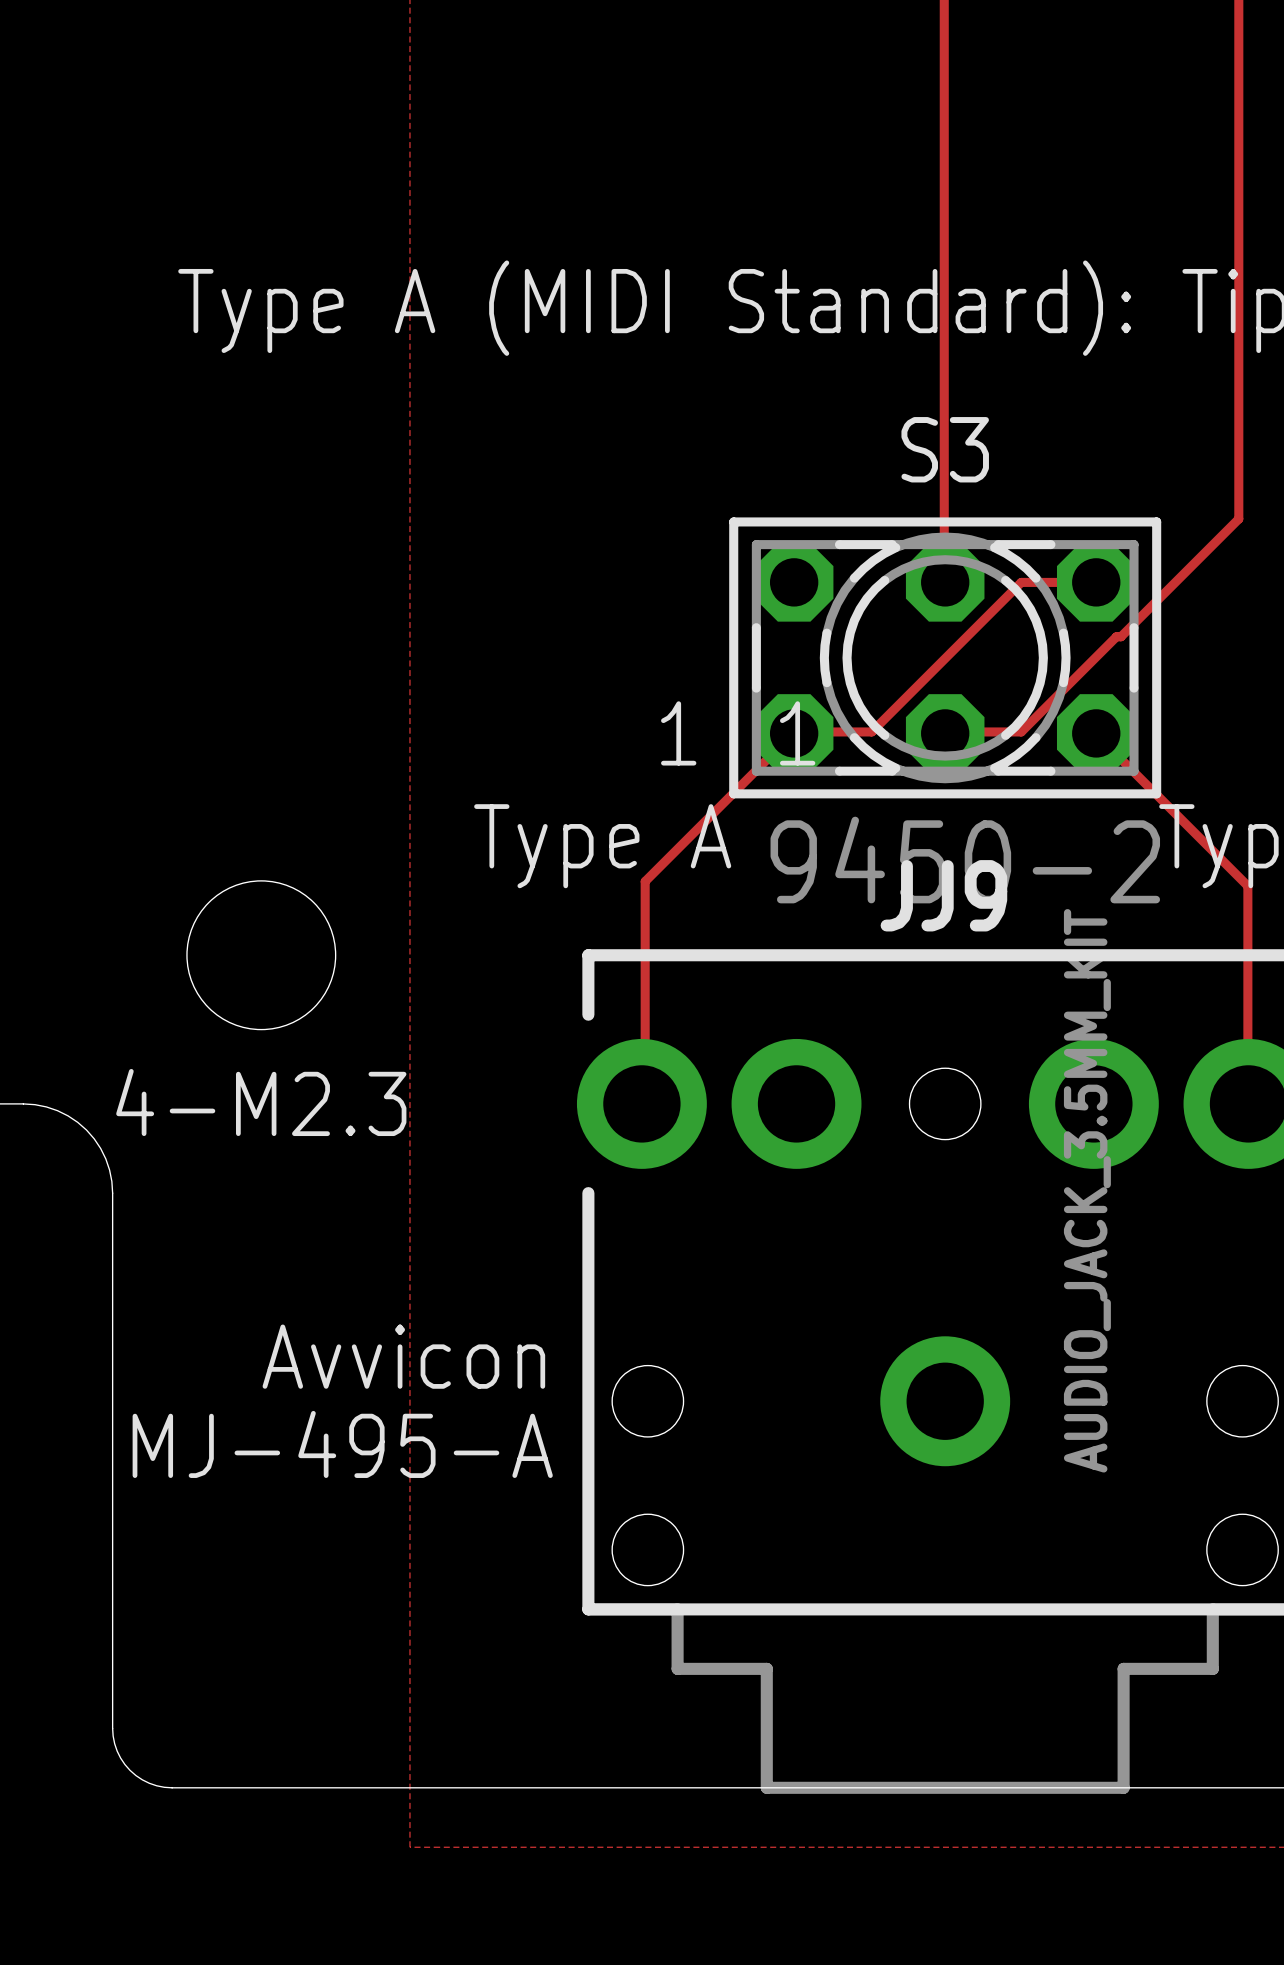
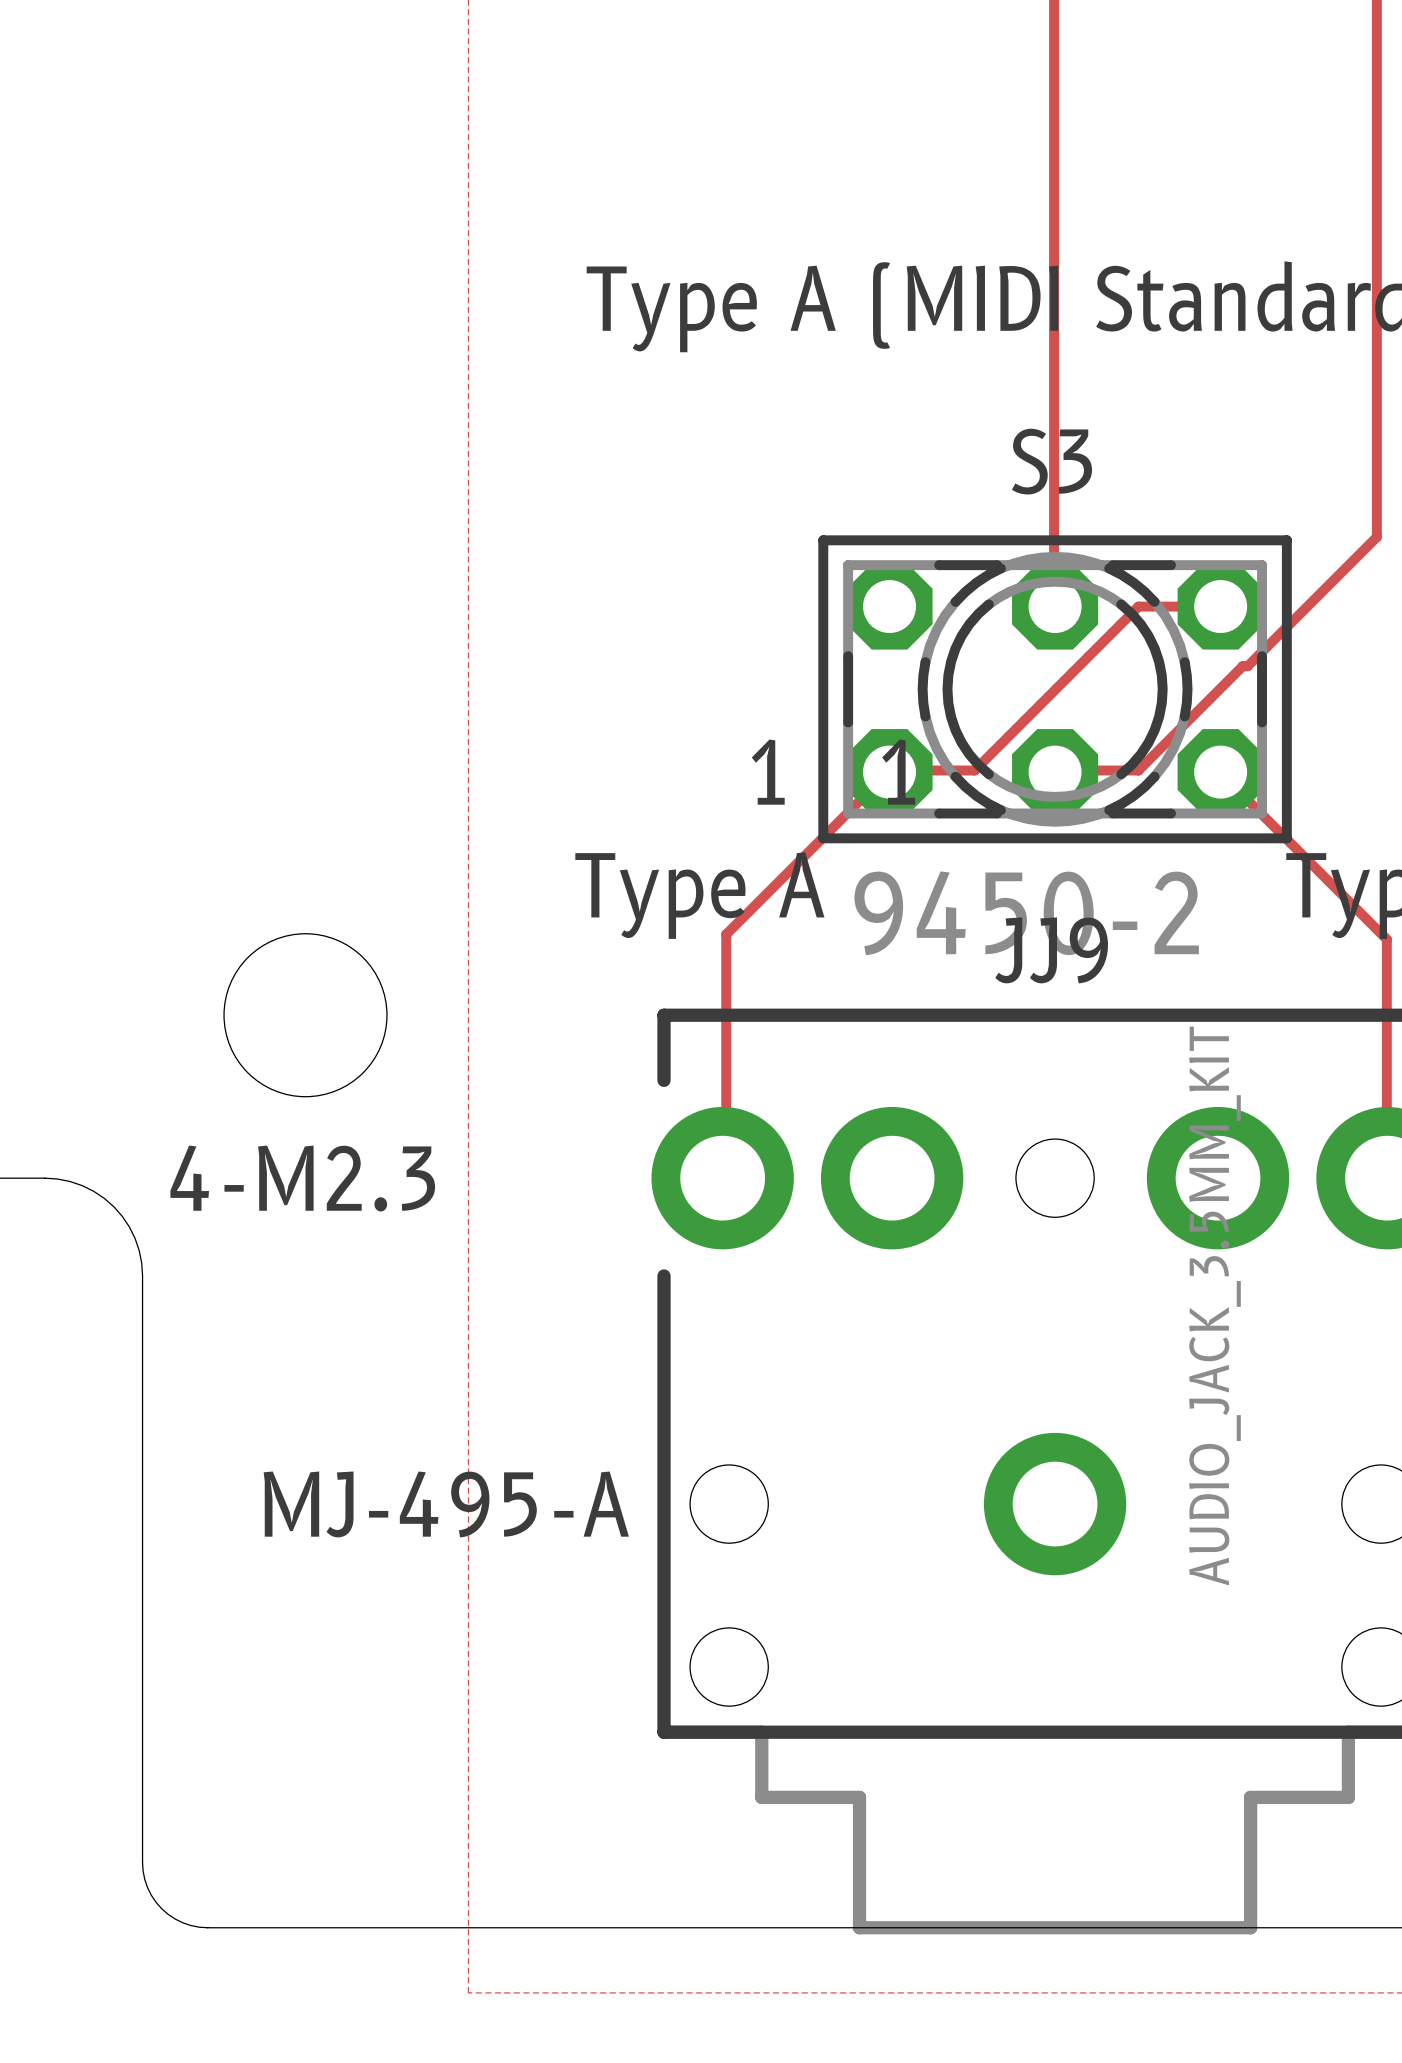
text: Avvicon (403, 1356) -> none
text position: MJ-495-A (342, 1444) -> MJ-495-A (446, 1504)

